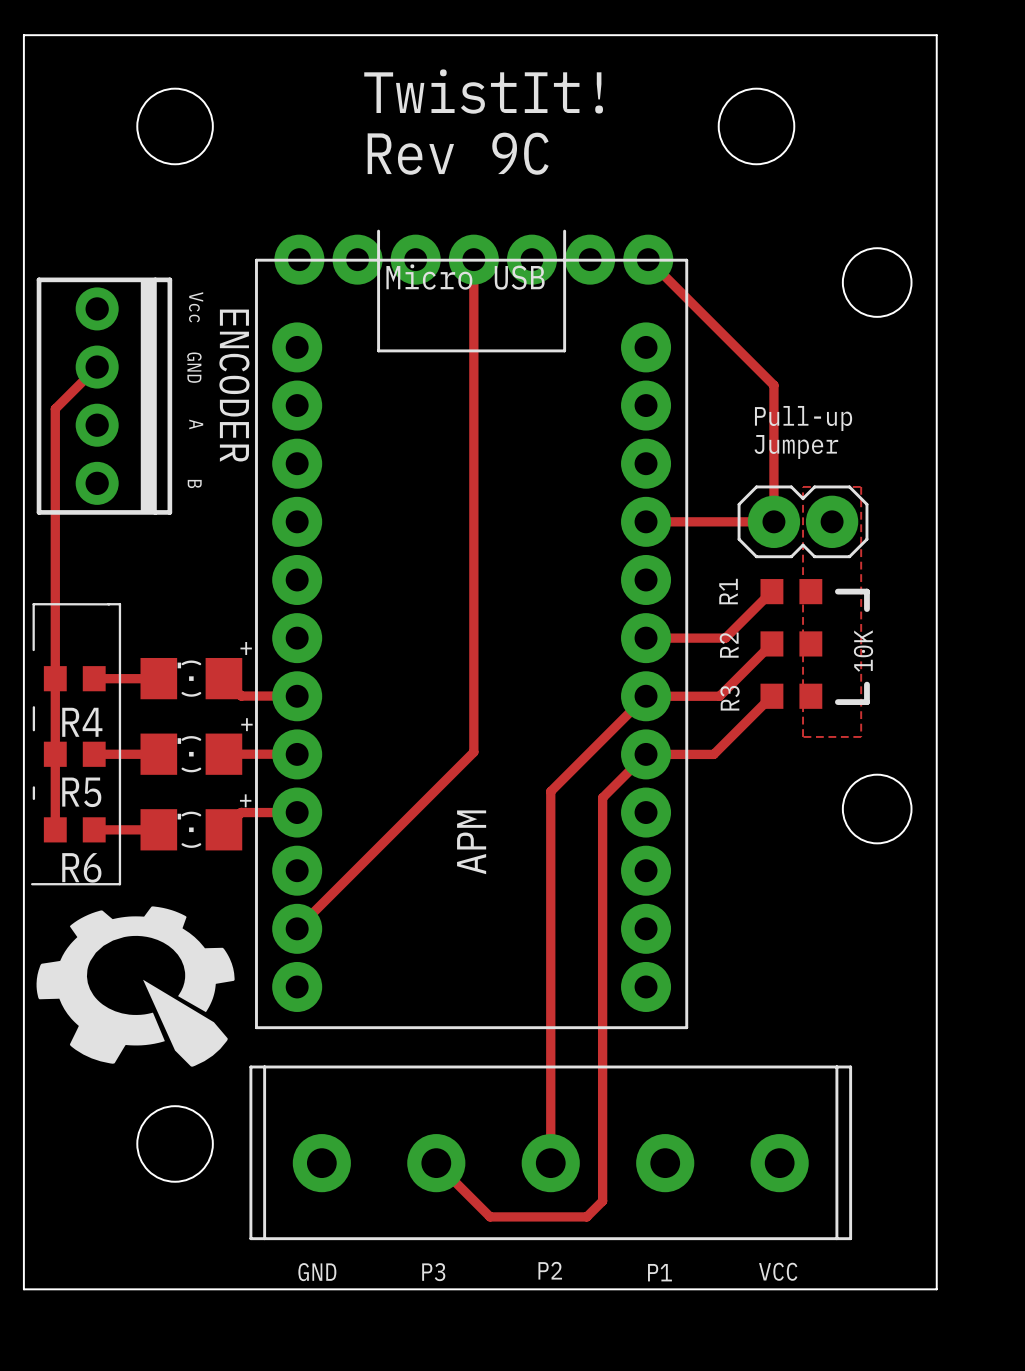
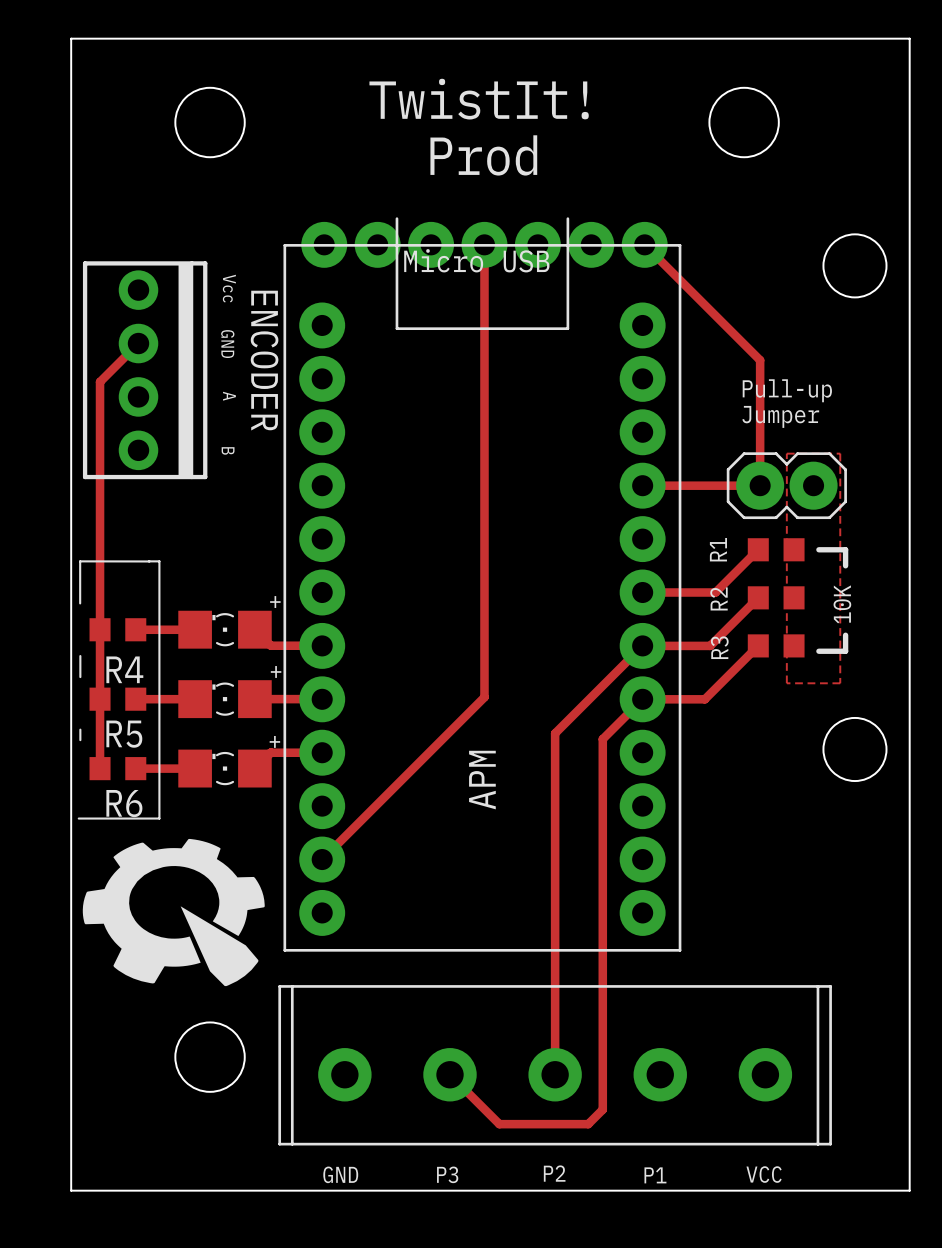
text position: TwistIt! (483, 91) -> TwistIt! (479, 99)
text: Rev 9C (458, 153) -> none
text: none -> Prod (483, 155)

